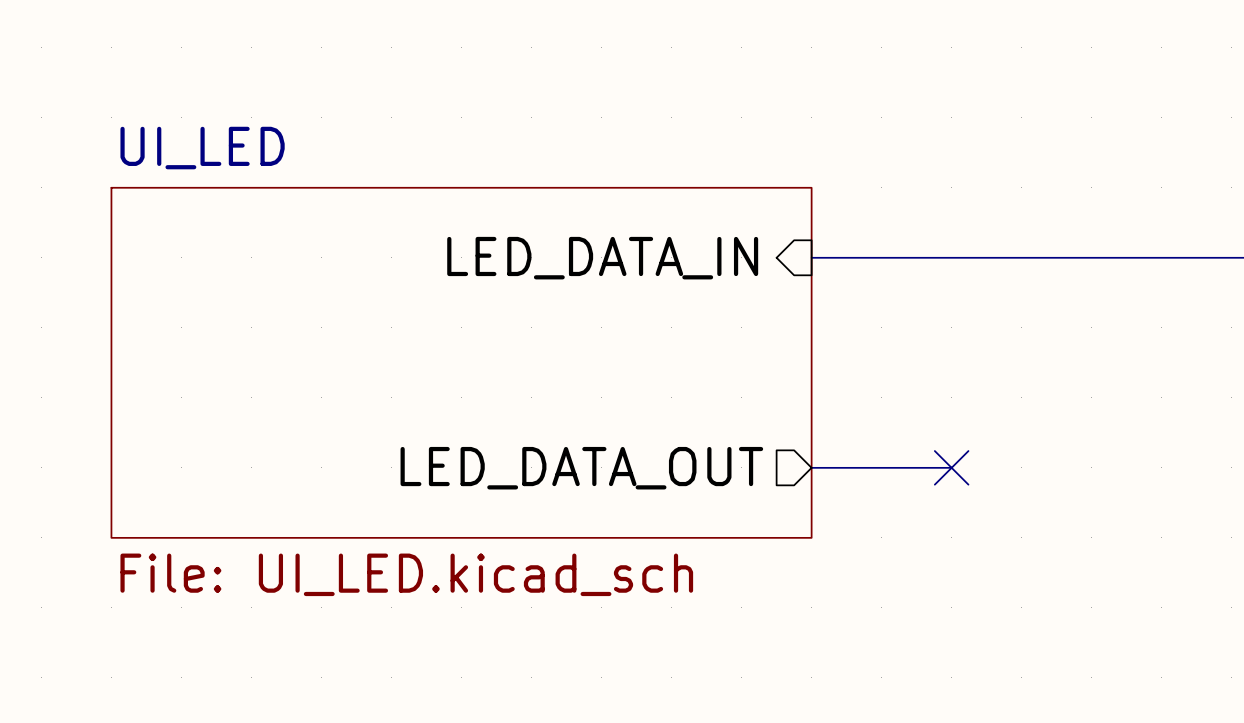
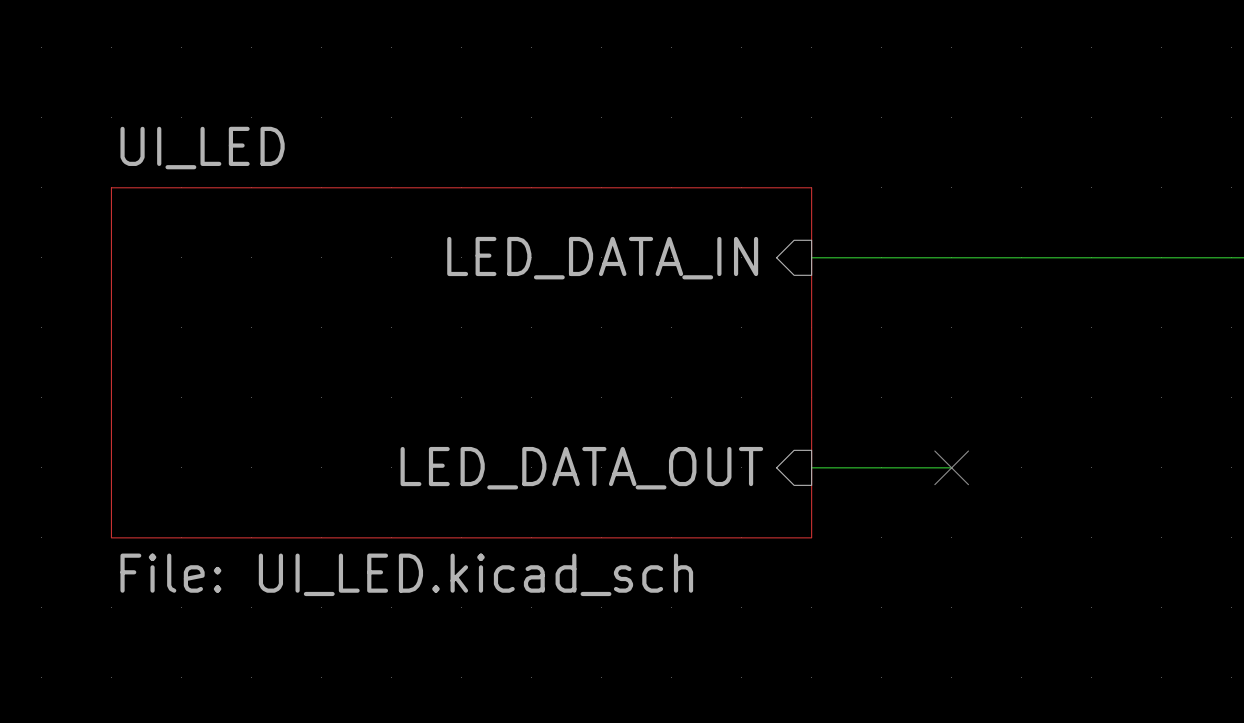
sheet pin shape: output (581, 468) -> input (581, 468)

